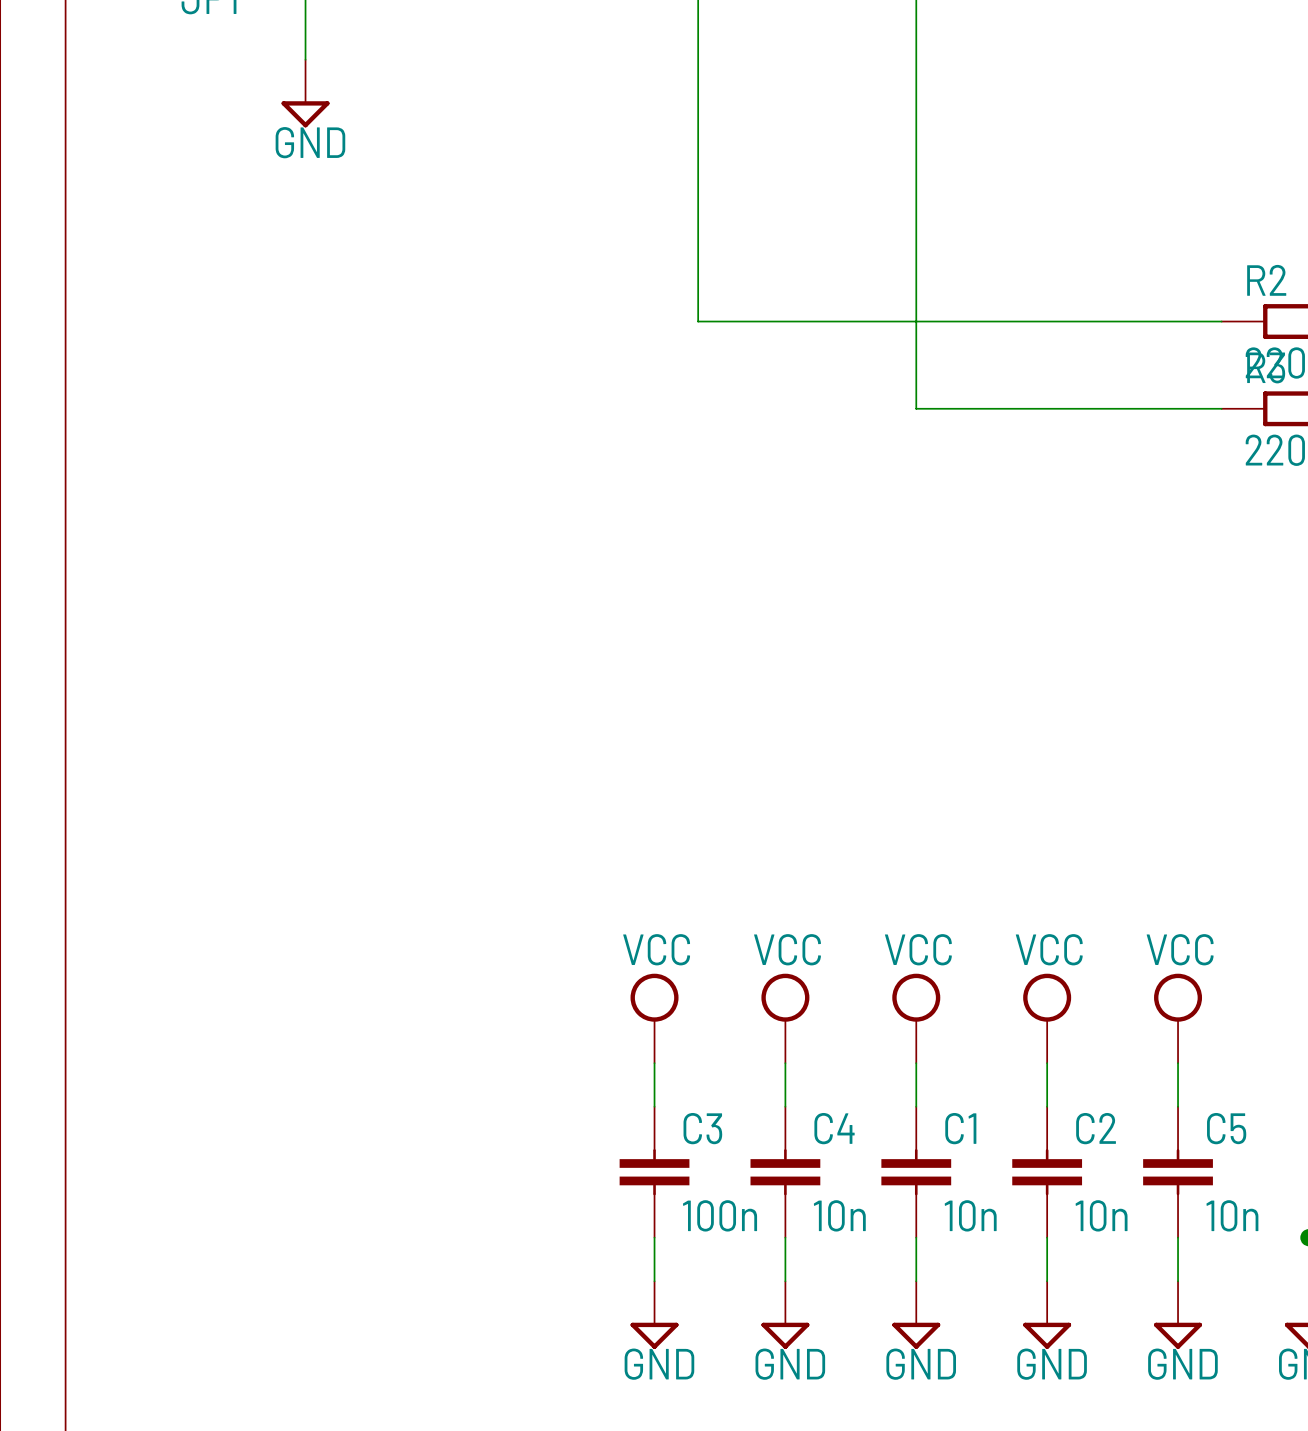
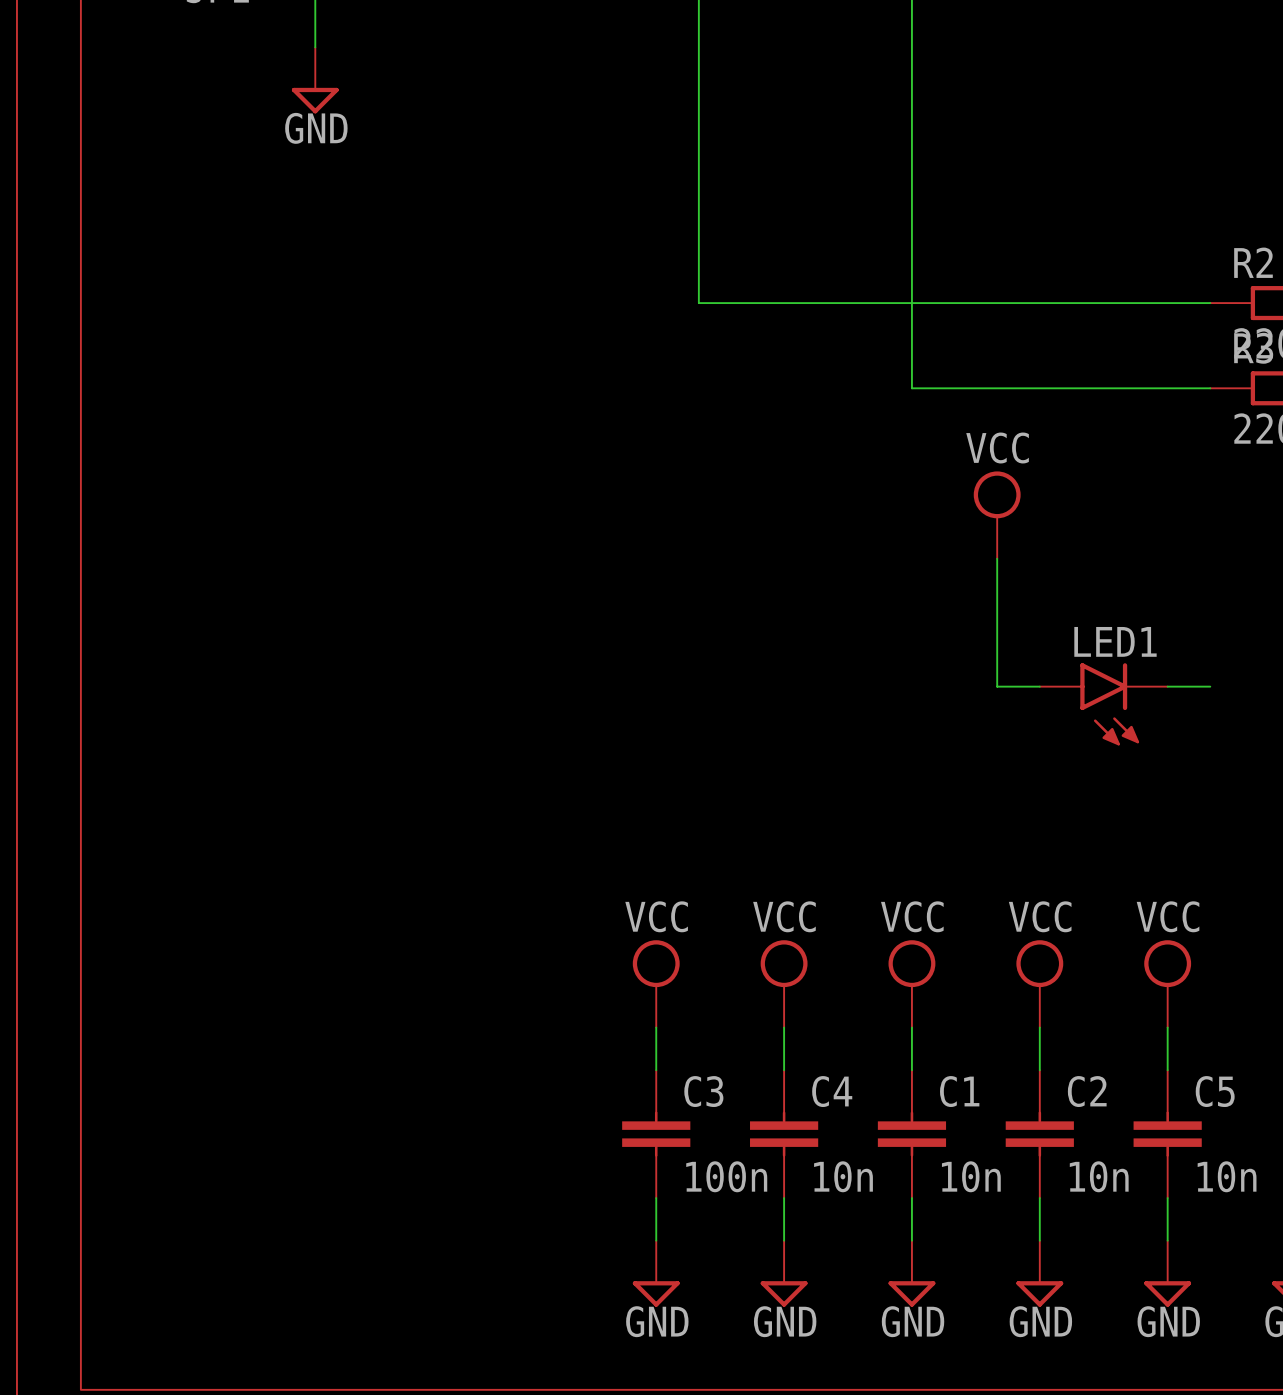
power symbol: none -> VCC (997, 515)
wire: none -> (997, 558) (997, 686) (1039, 686)
wire: none -> (1167, 686) (1210, 686)
LED1: none -> (1103, 704)

